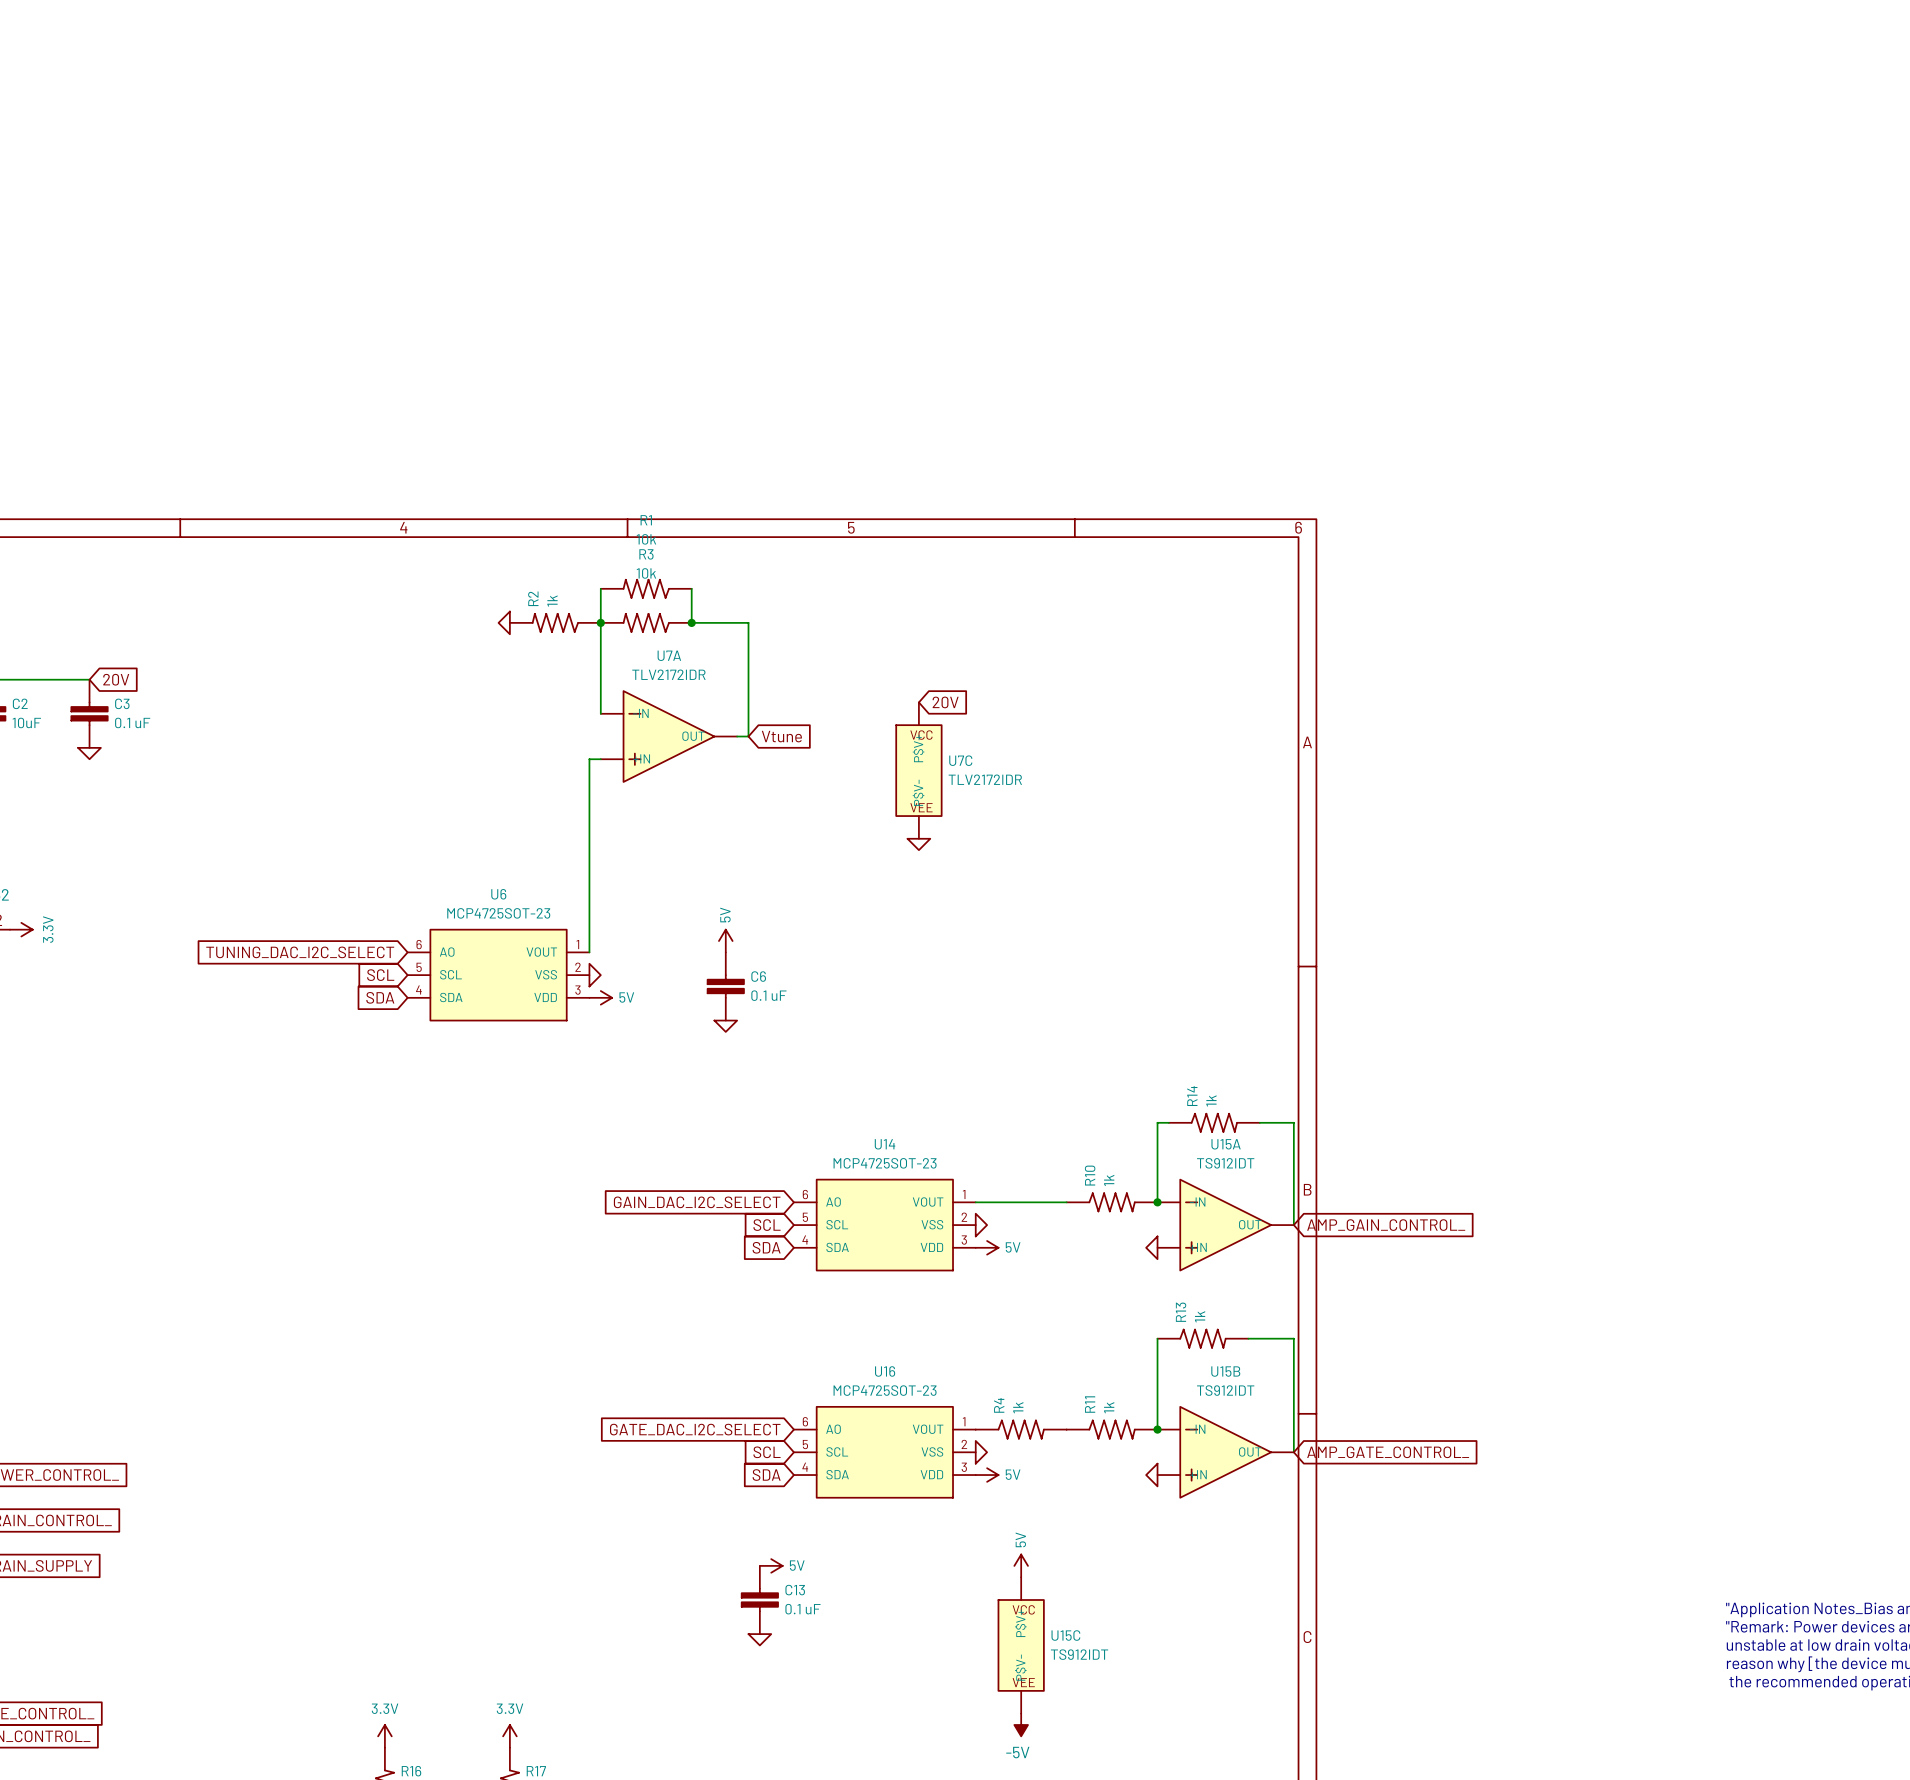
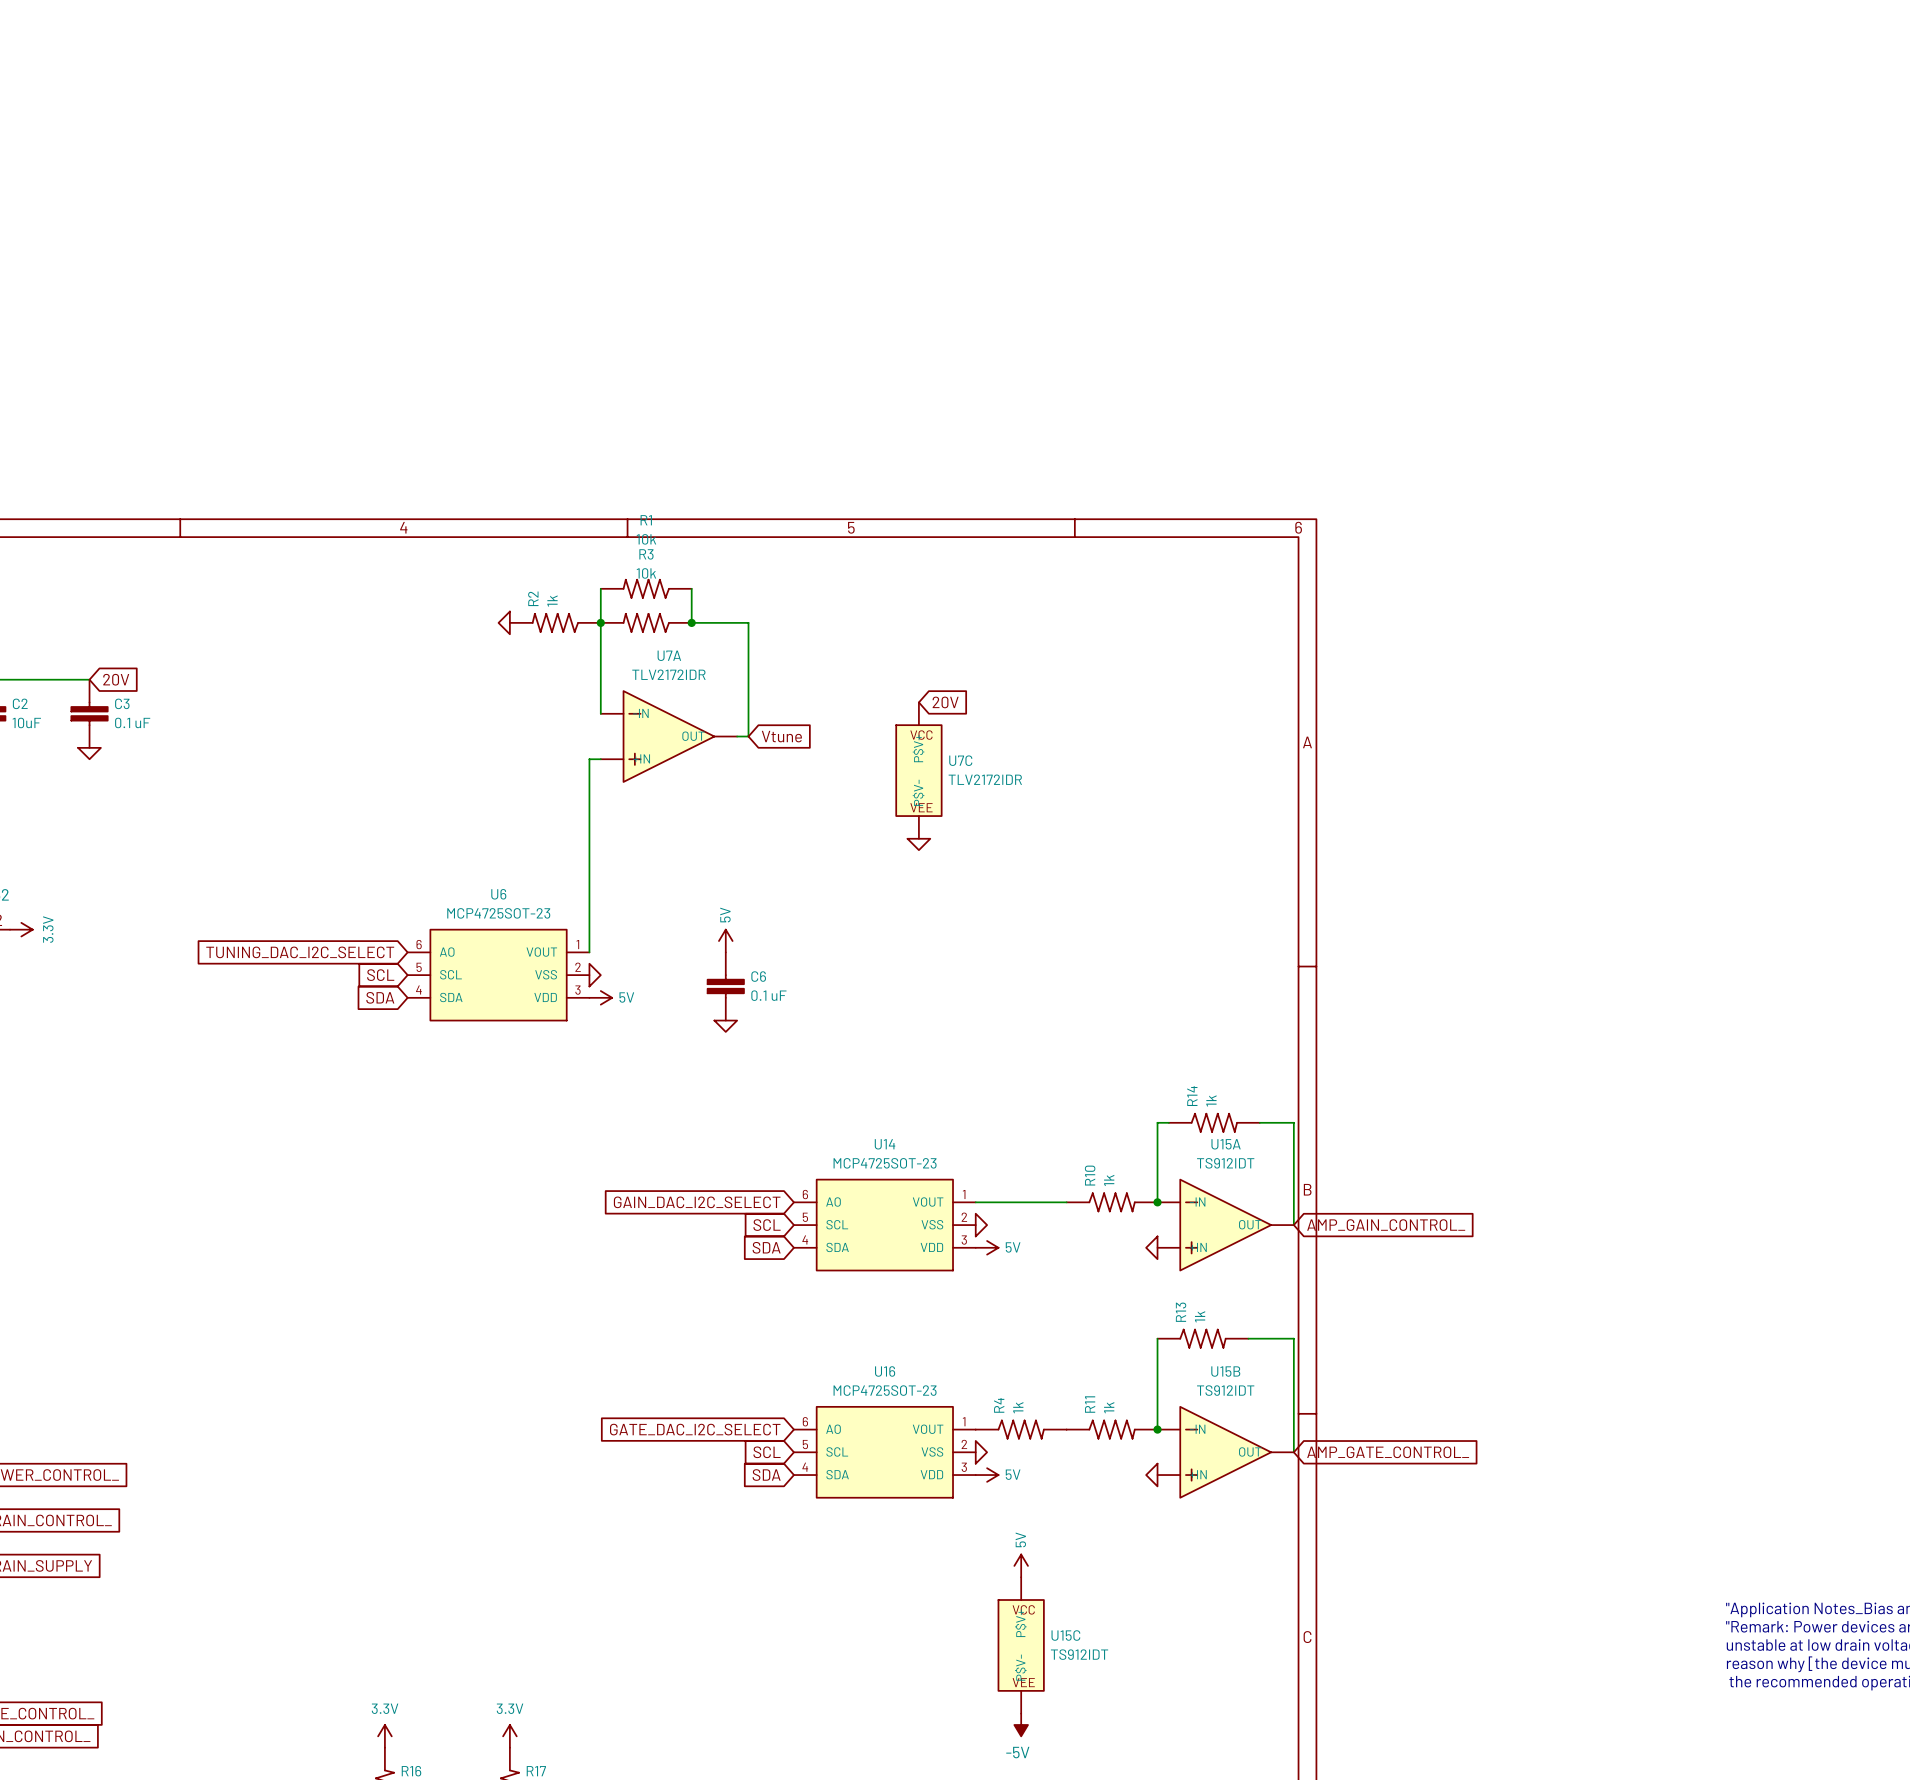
power symbol: 5V (771, 1565) -> none
C13: 0.1 uF (759, 1600) -> none
power symbol: (759, 1639) -> none

